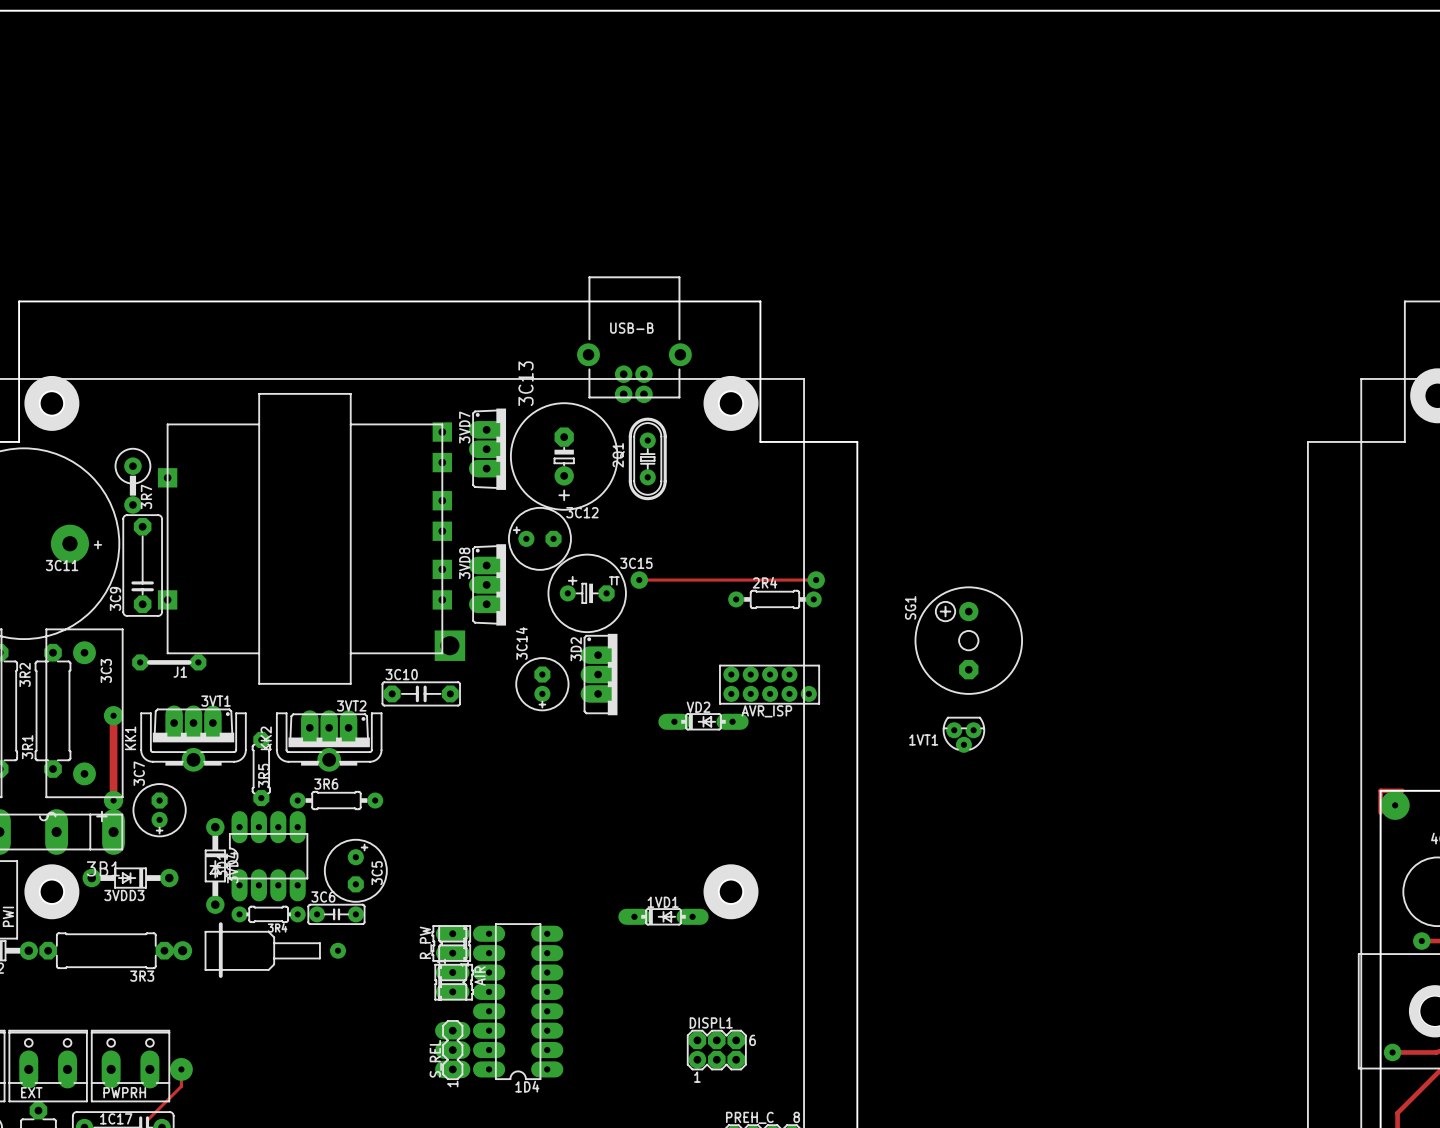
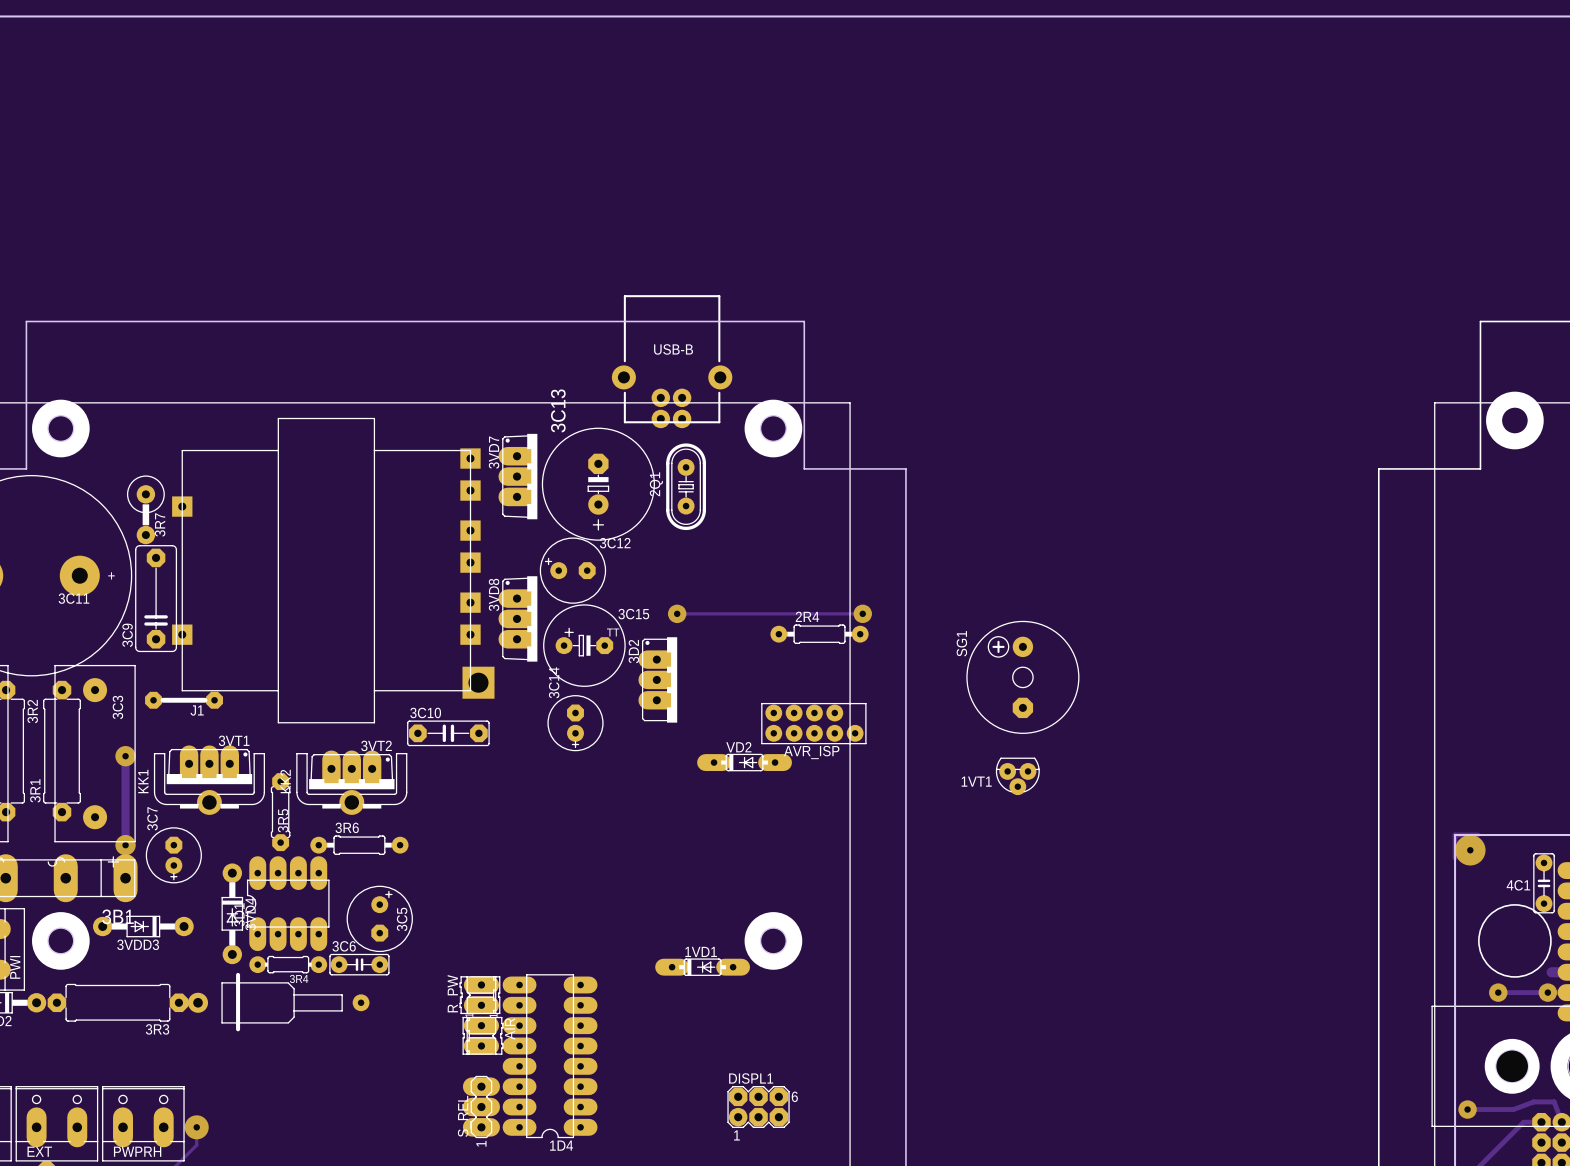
3C15 position: (587, 593) -> (584, 645)
3D2 position: (599, 674) -> (657, 679)

